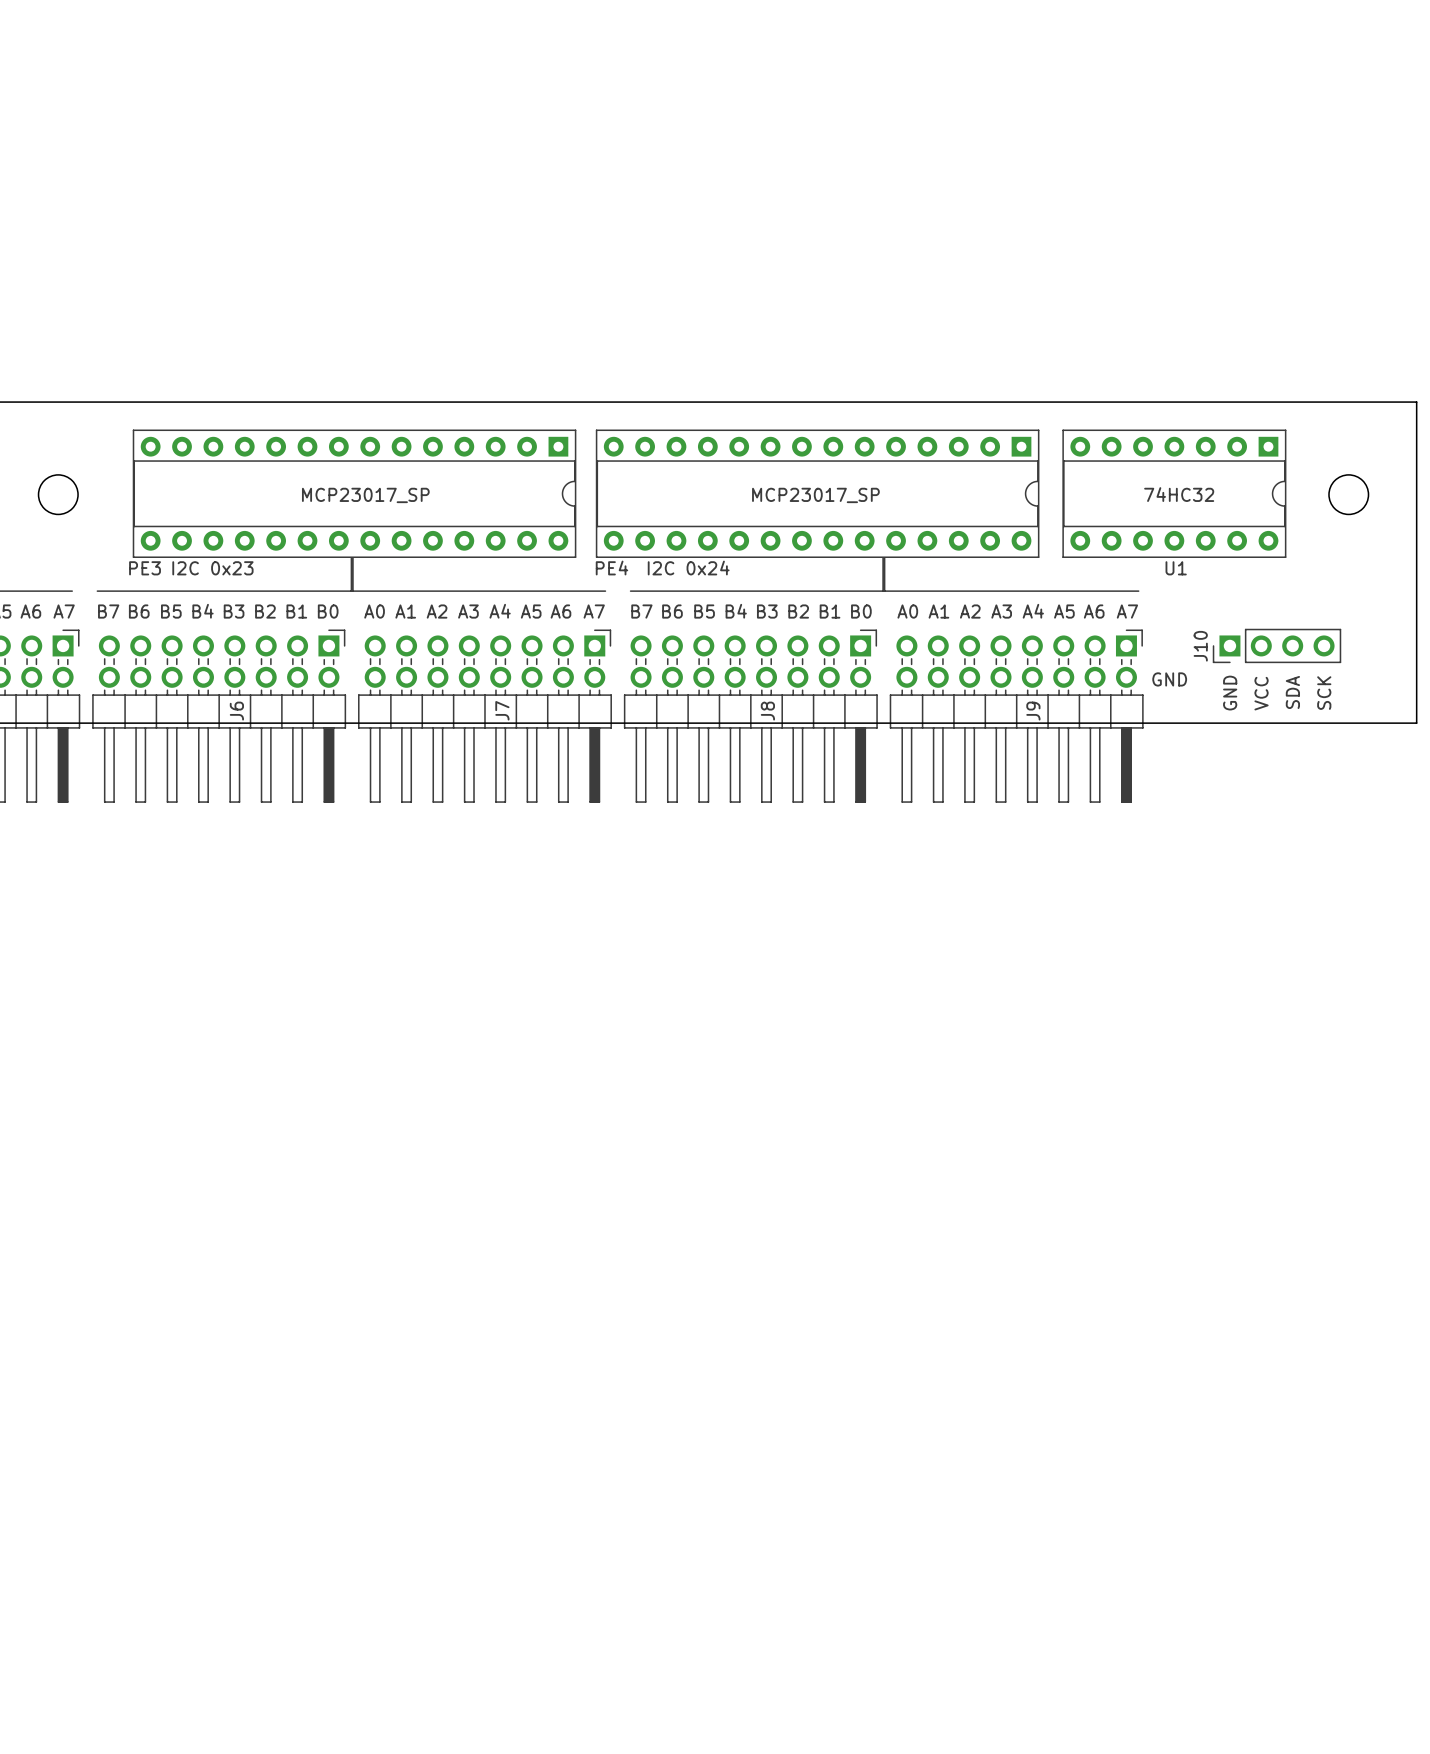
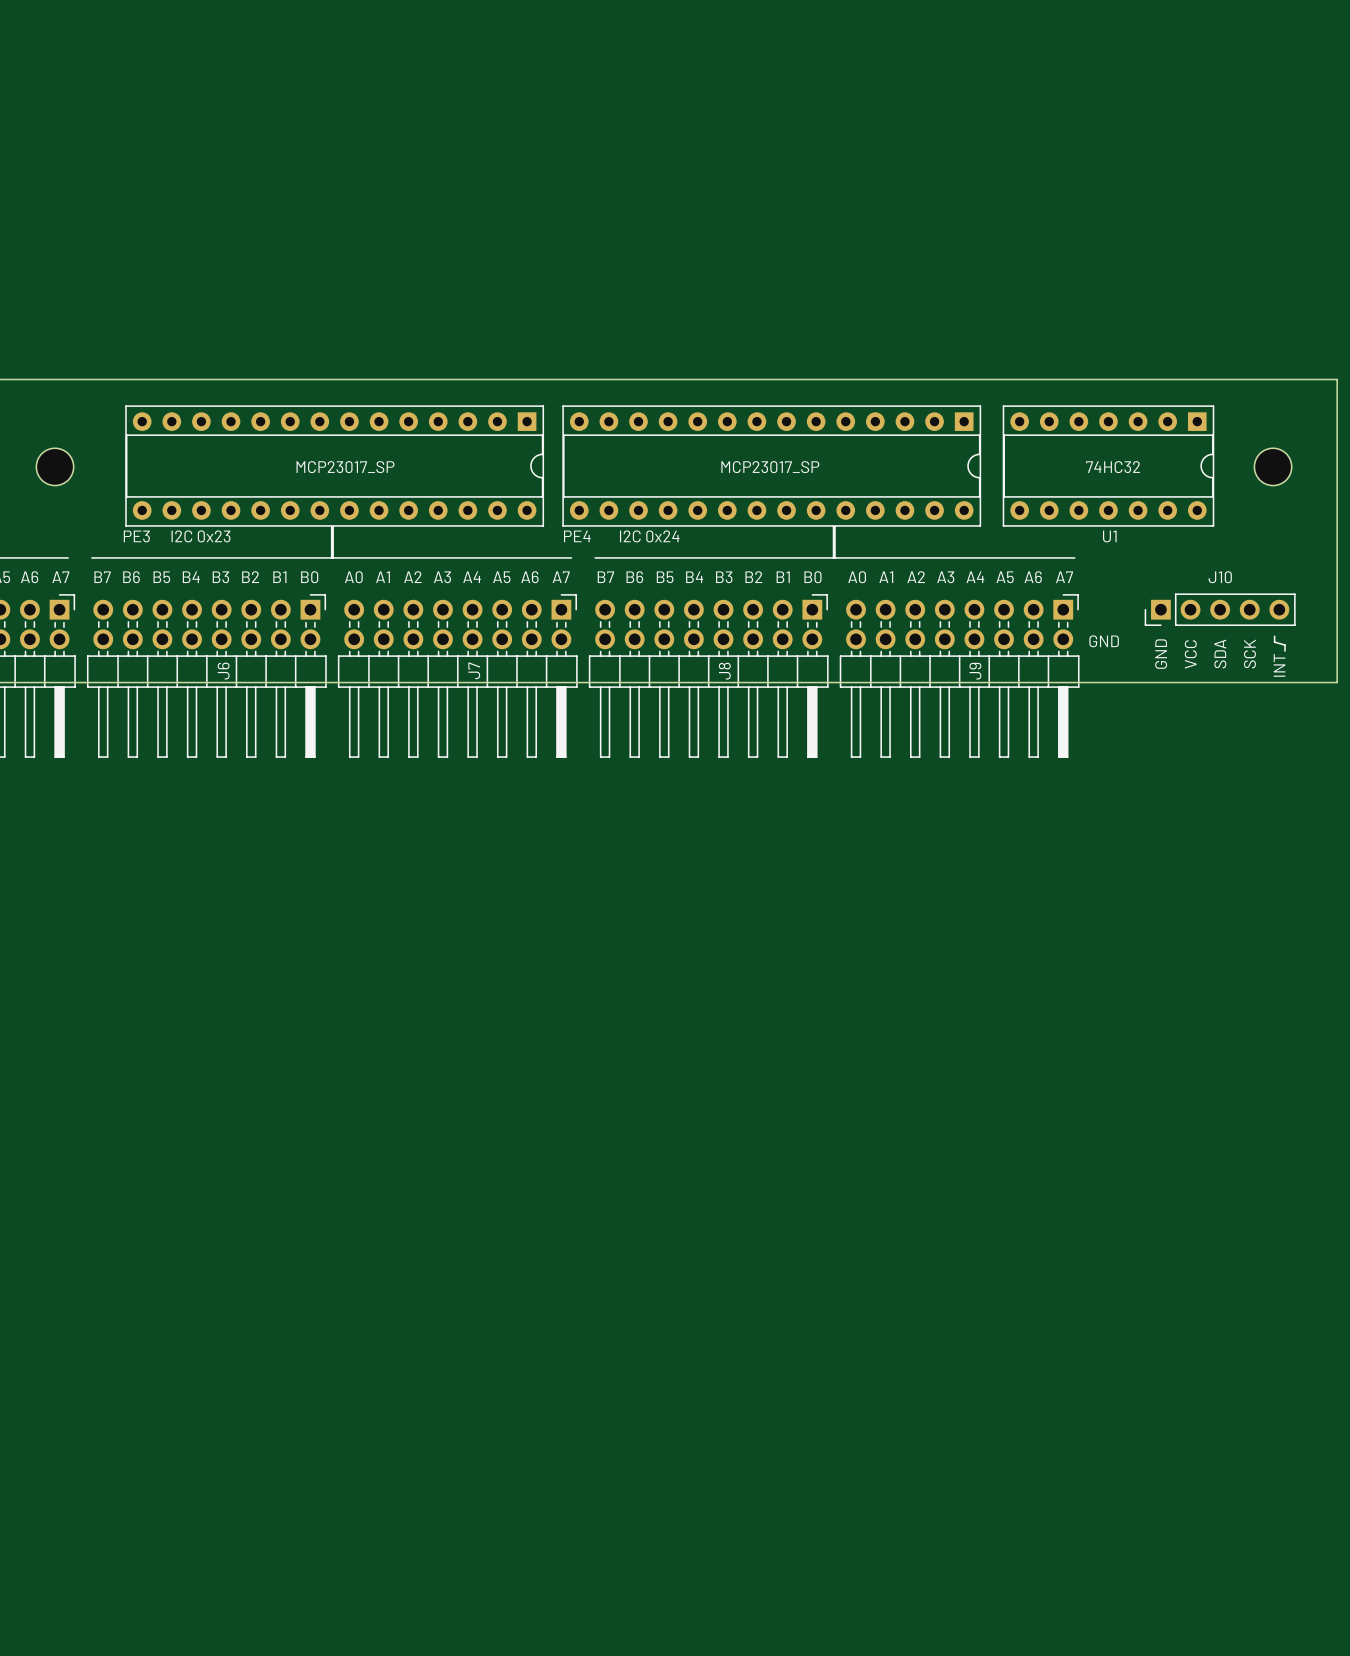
J10 footprint: [1212, 628, 1342, 664] -> [1144, 593, 1296, 626]
J10 name position: J10 (1200, 646) -> J10 (1220, 577)
line: none -> (1274, 636) (1274, 642) (1284, 645) (1284, 651)
text: none -> INT (1279, 665)

